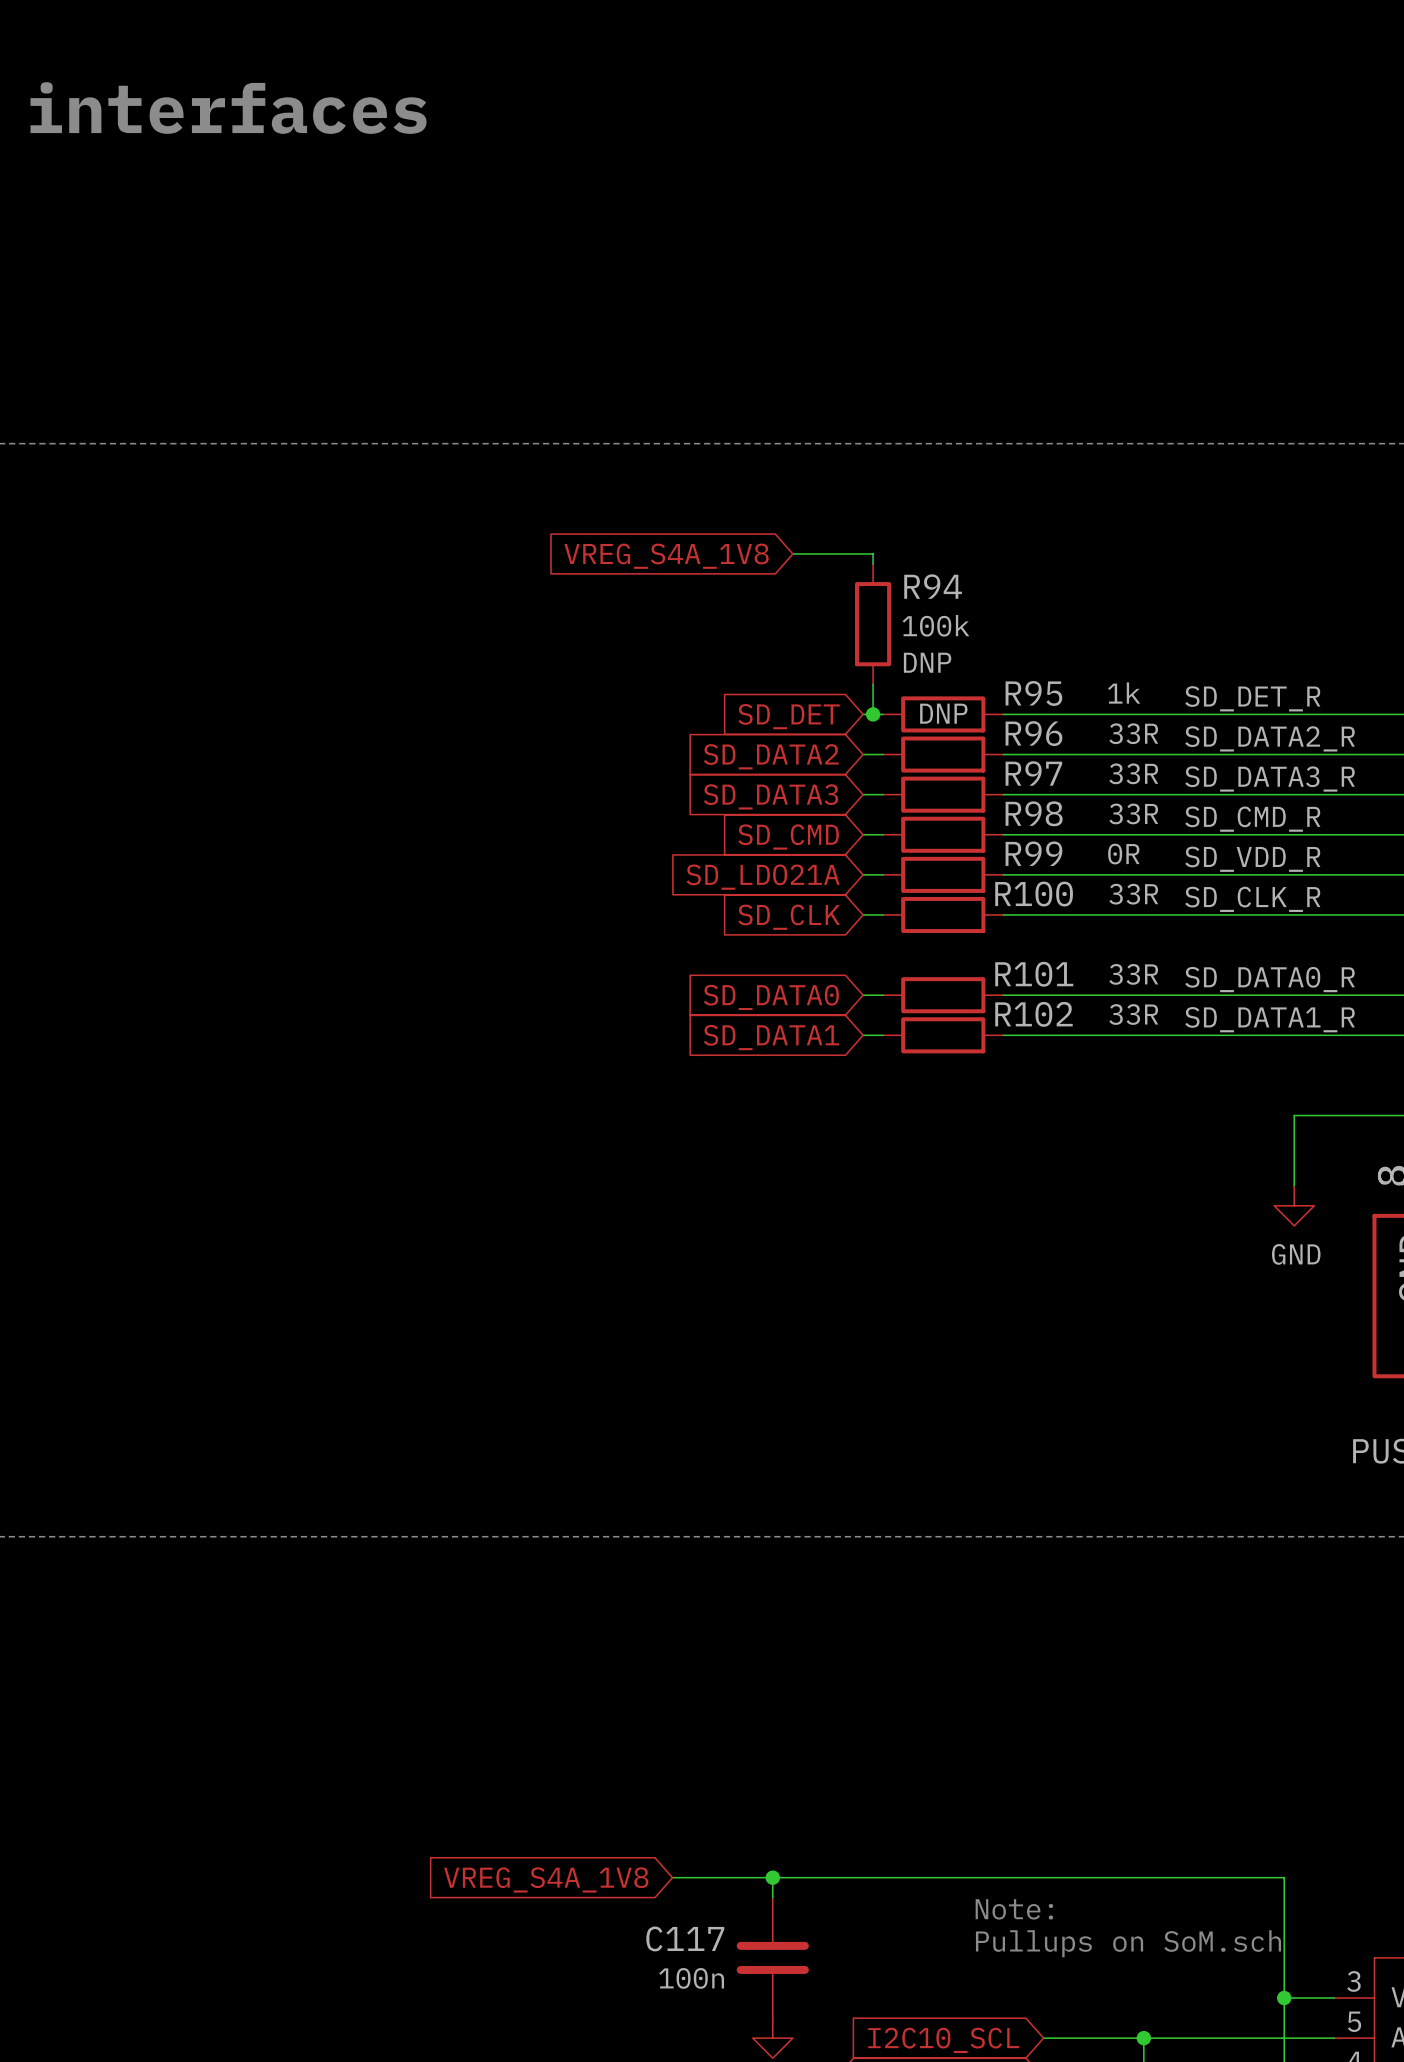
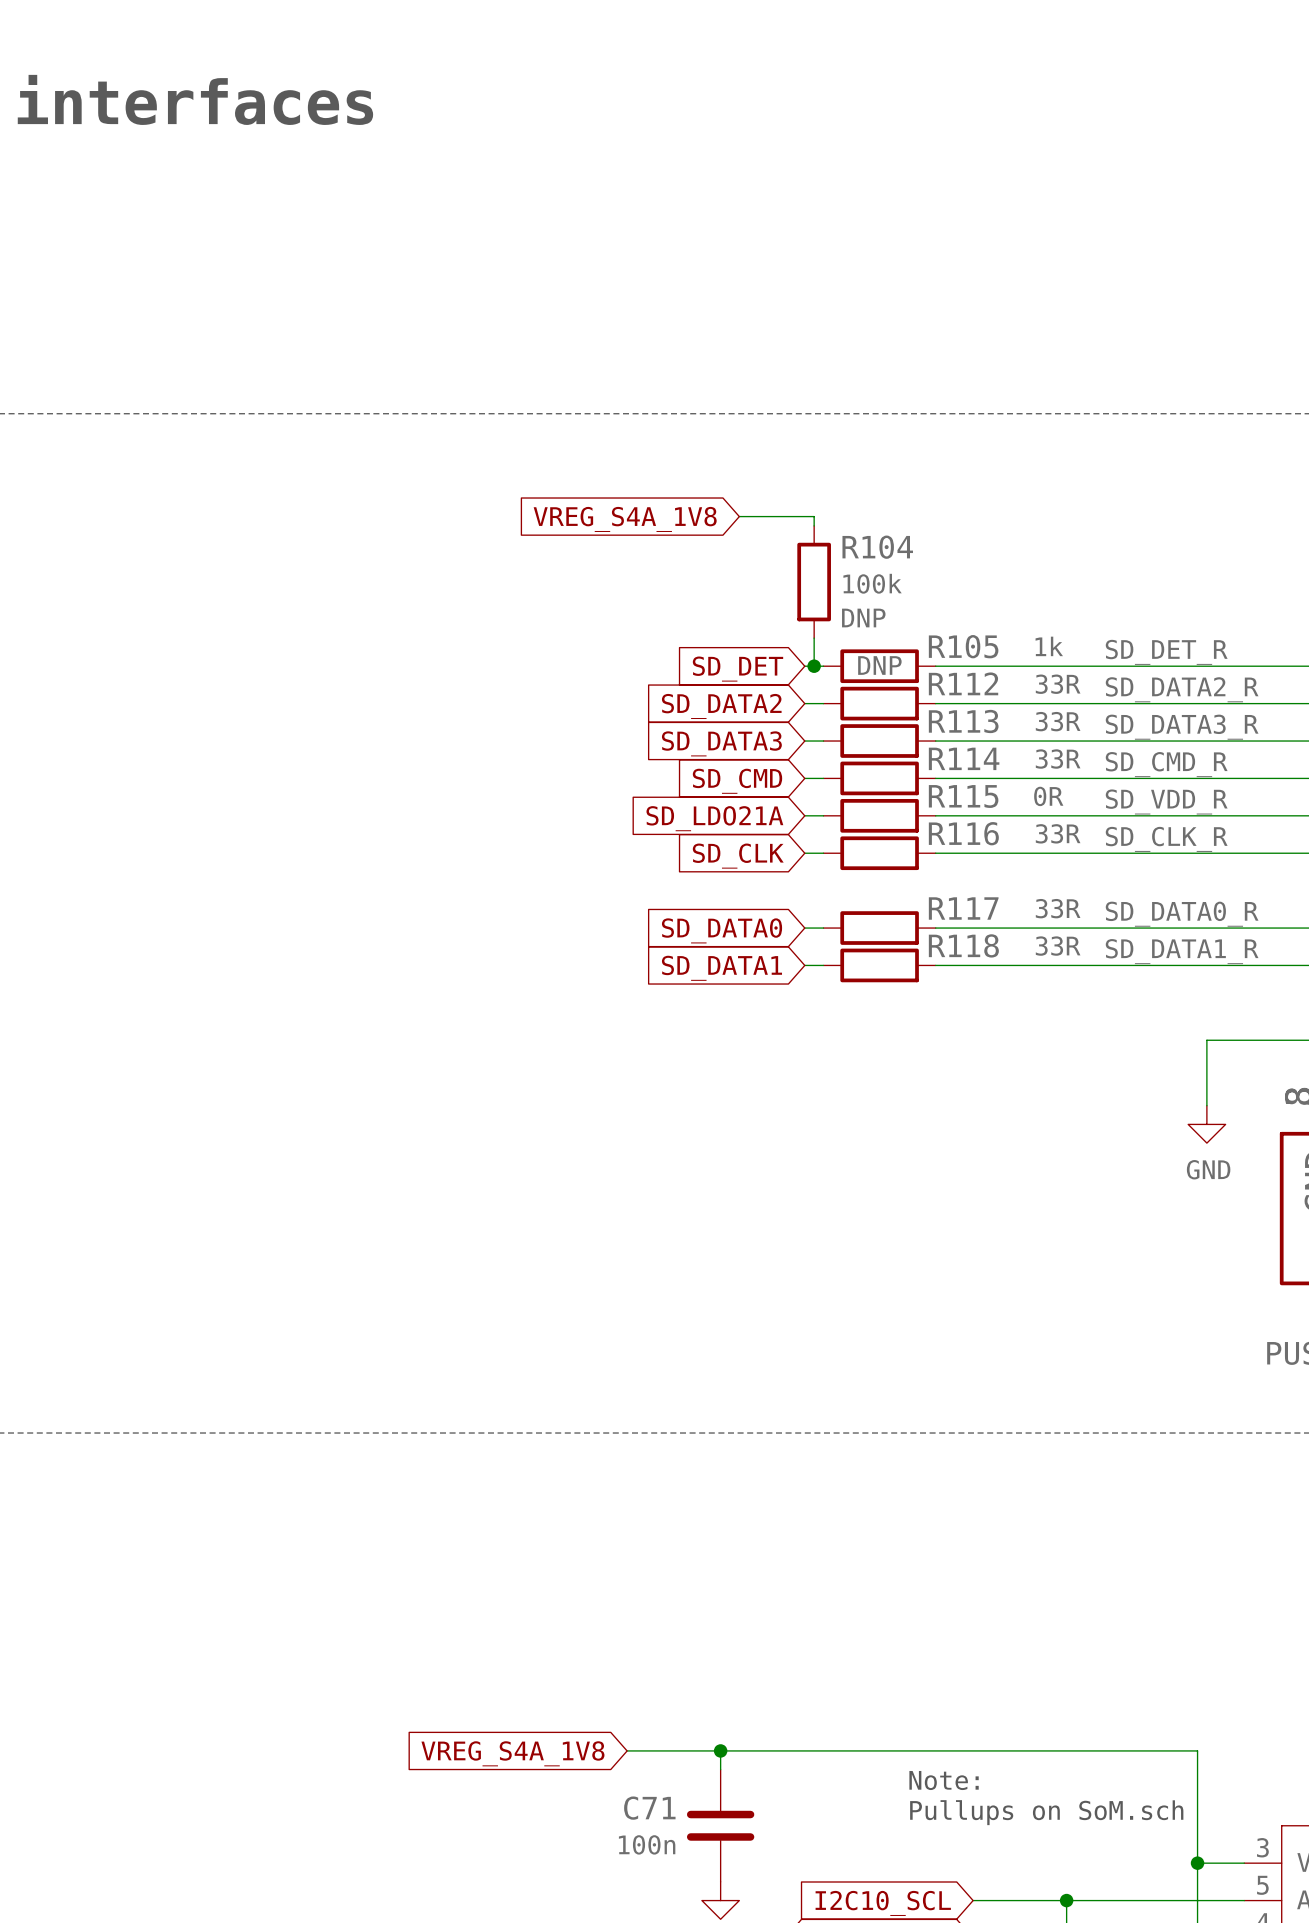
R94 name: R94 (933, 586) -> R104 (877, 547)
R95 name: R95 (1033, 693) -> R105 (963, 646)
R96 name: R96 (1033, 733) -> R112 (963, 683)
R97 name: R97 (1033, 773) -> R113 (963, 721)
R98 name: R98 (1034, 813) -> R114 (964, 758)
R99 name: R99 (1033, 853) -> R115 (963, 796)
R100 name: R100 (1034, 894) -> R116 (963, 833)
R101 name: R101 (1034, 974) -> R117 (963, 908)
R102 name: R102 (1033, 1014) -> R118 (963, 945)
C117 name: C117 (685, 1938) -> C71 (649, 1808)

